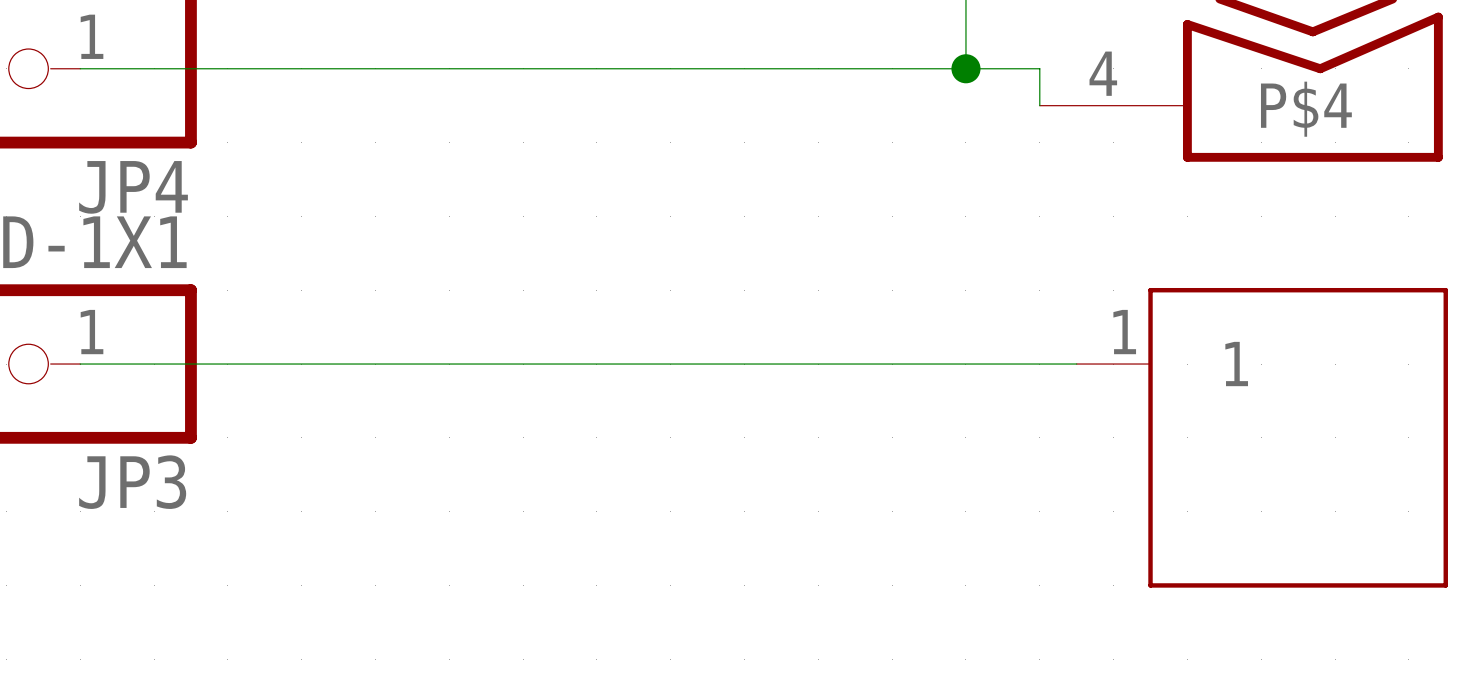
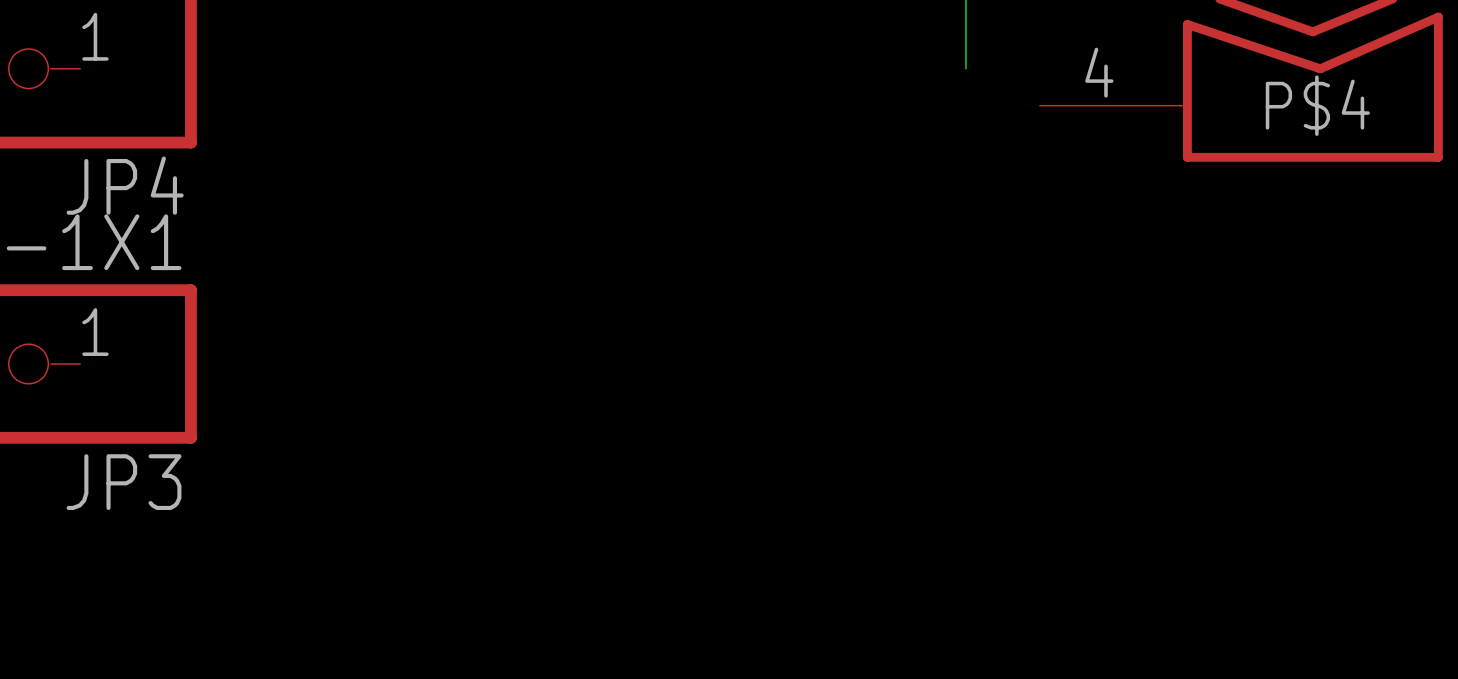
wire: (80, 68) (1039, 68) (1039, 105) -> none
junction: (965, 68) -> none
wire: (80, 364) (1076, 364) -> none
part: (1262, 437) -> none

